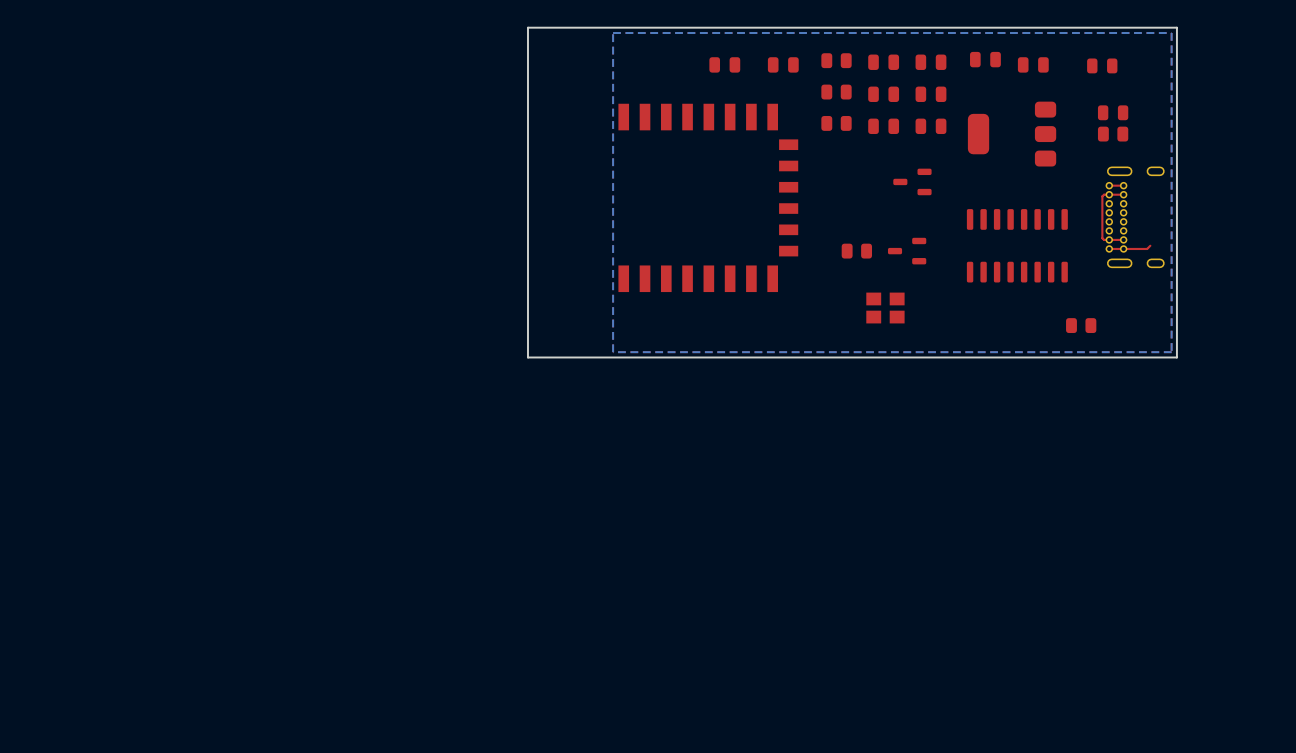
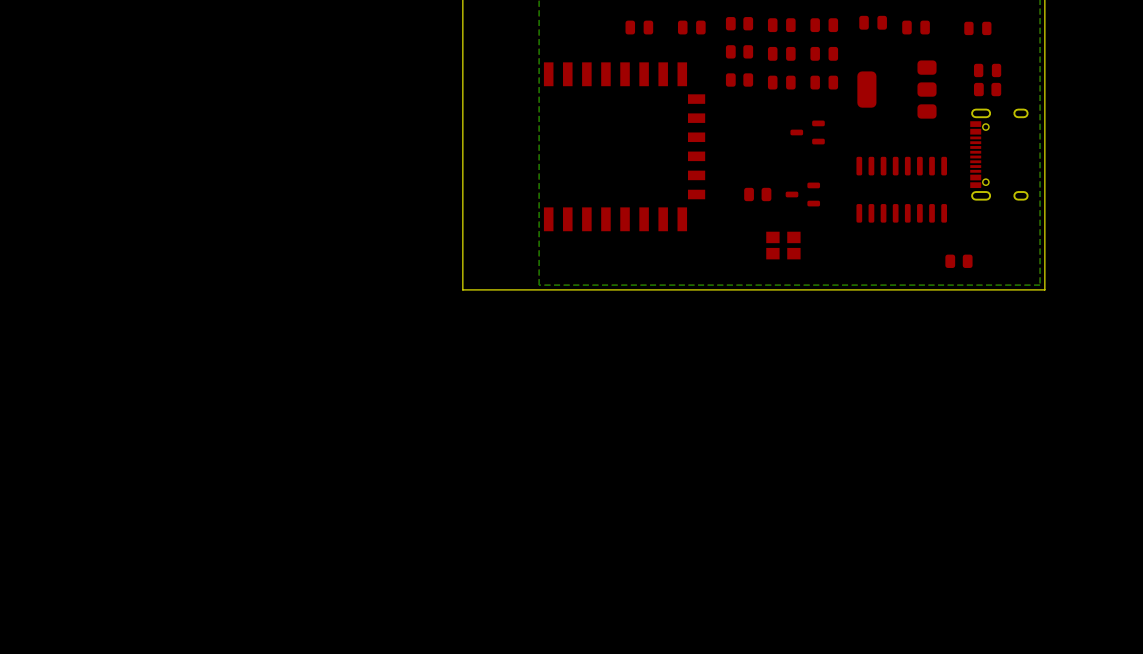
top track: (1123, 185) (1109, 185) -> none
top track: (1123, 194) (1104, 194) (1102, 196) (1102, 238) (1104, 239) (1123, 239) -> none
part: none -> (999, 154)
part: (1135, 217) -> none
top track: (1150, 245) (1147, 248) (1109, 248) -> none

